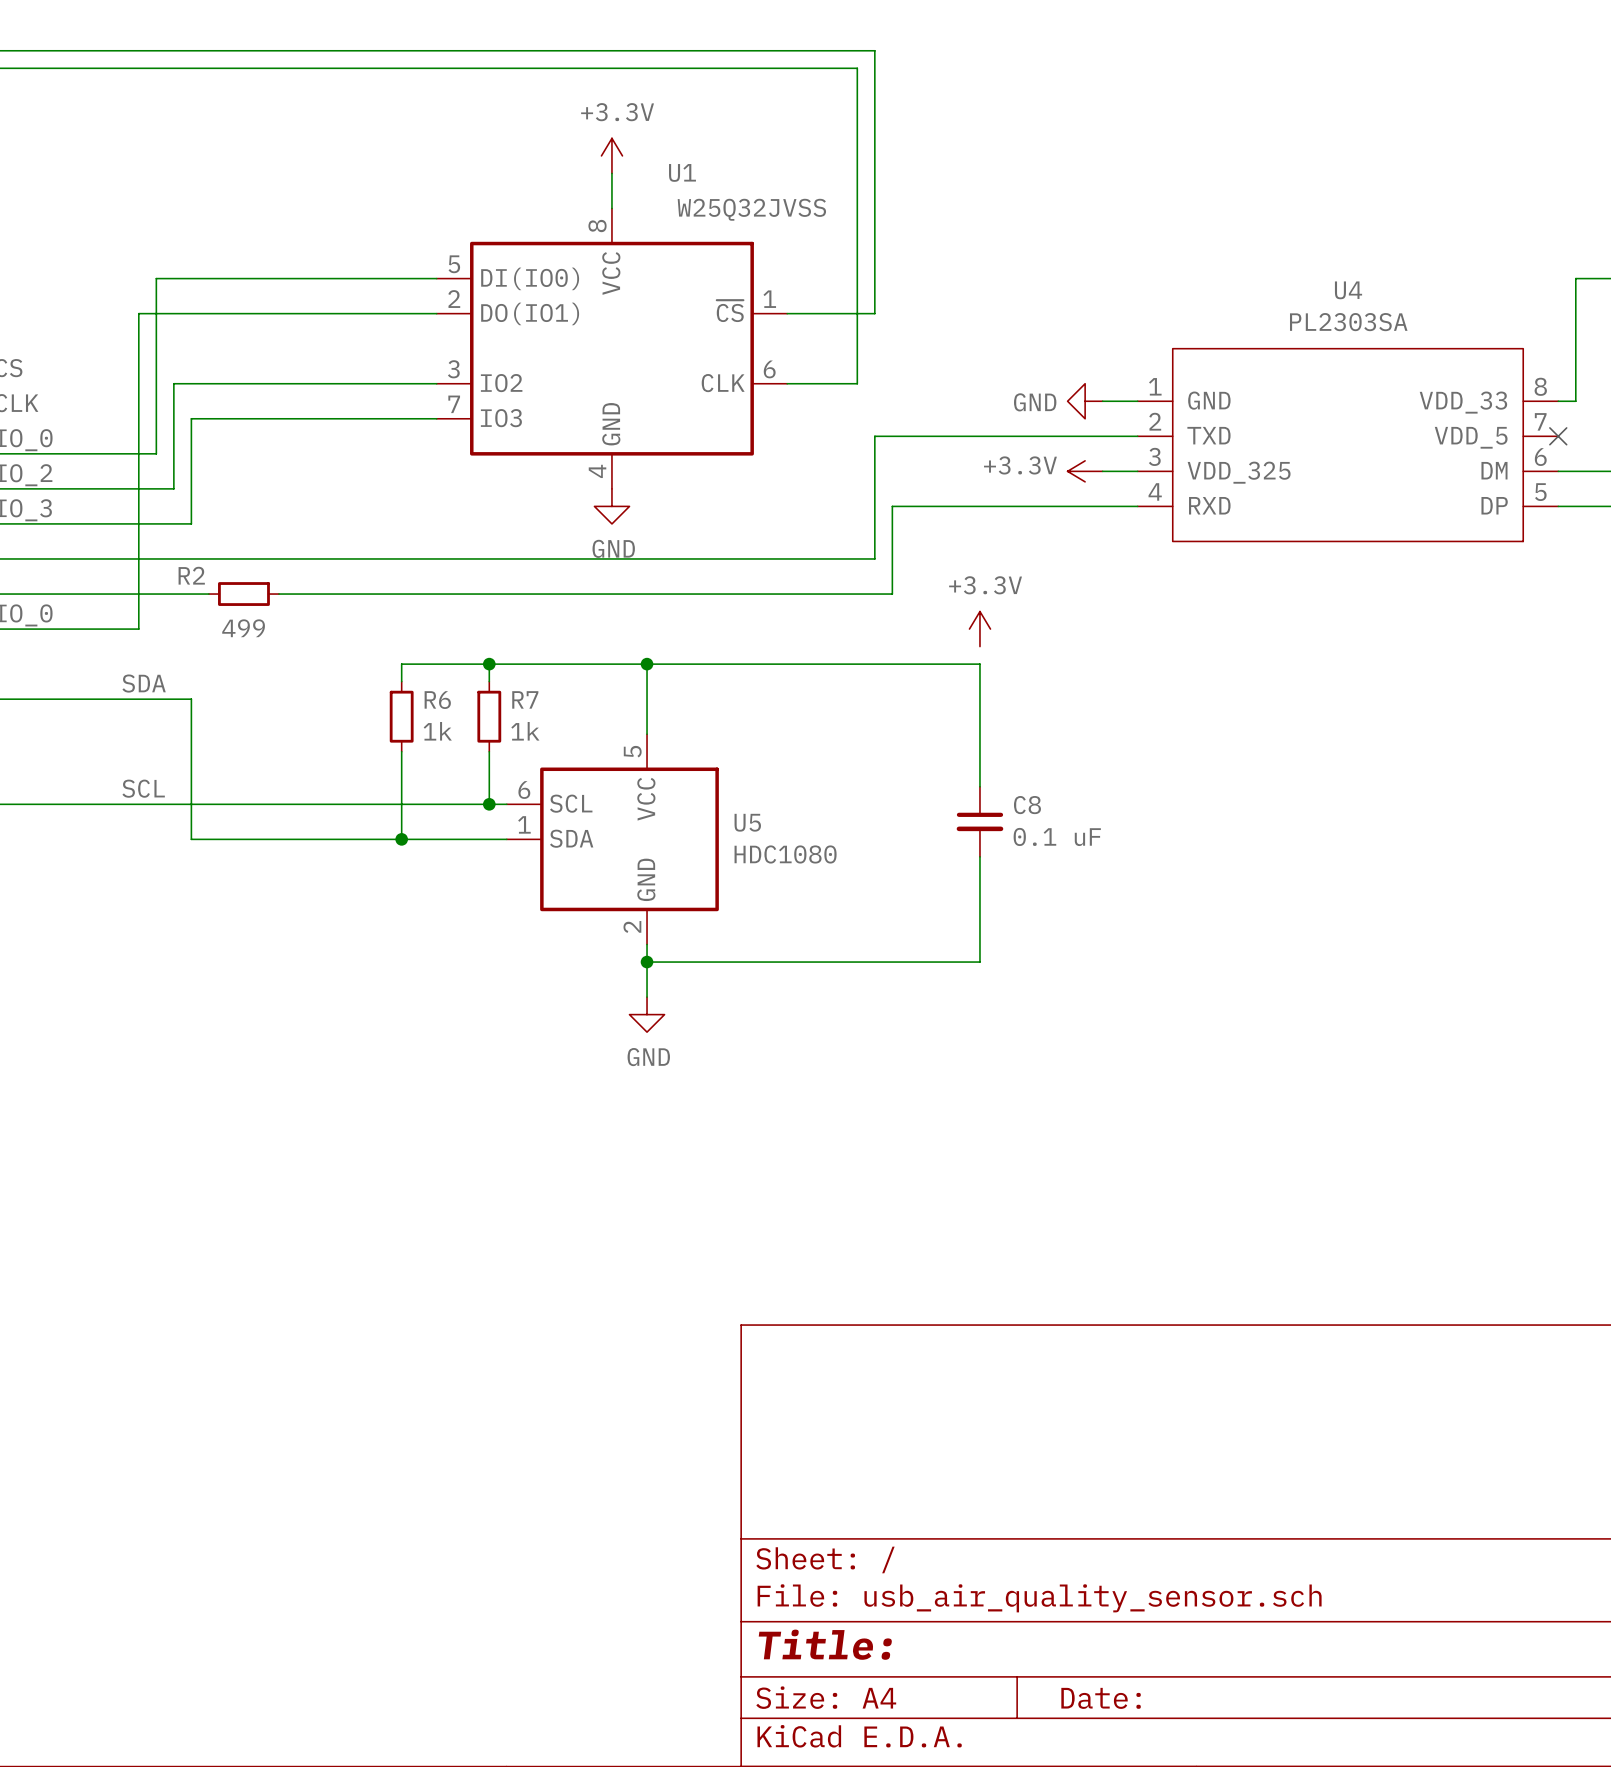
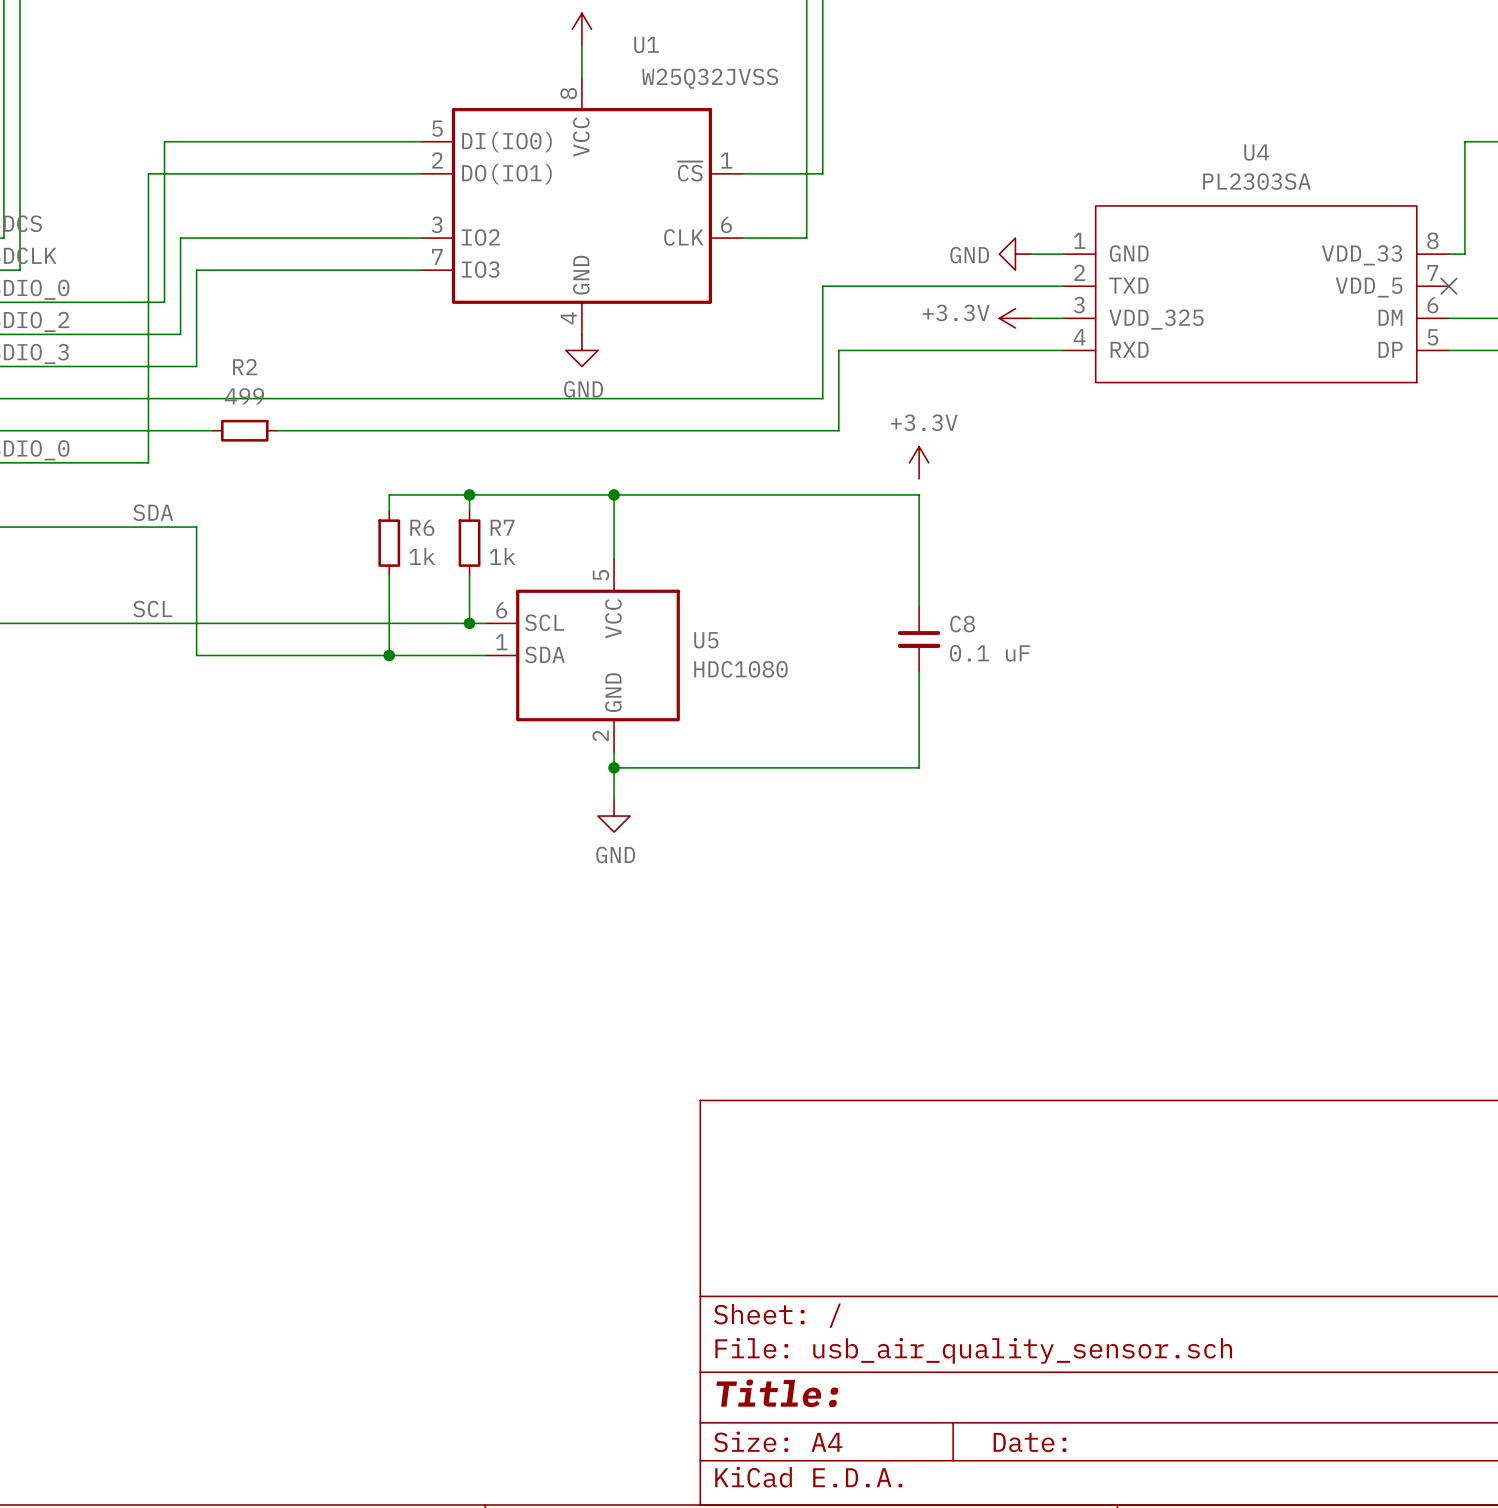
R2 name position: R2 (191, 575) -> R2 (245, 367)
R2 value position: 499 (243, 628) -> 499 (244, 396)

